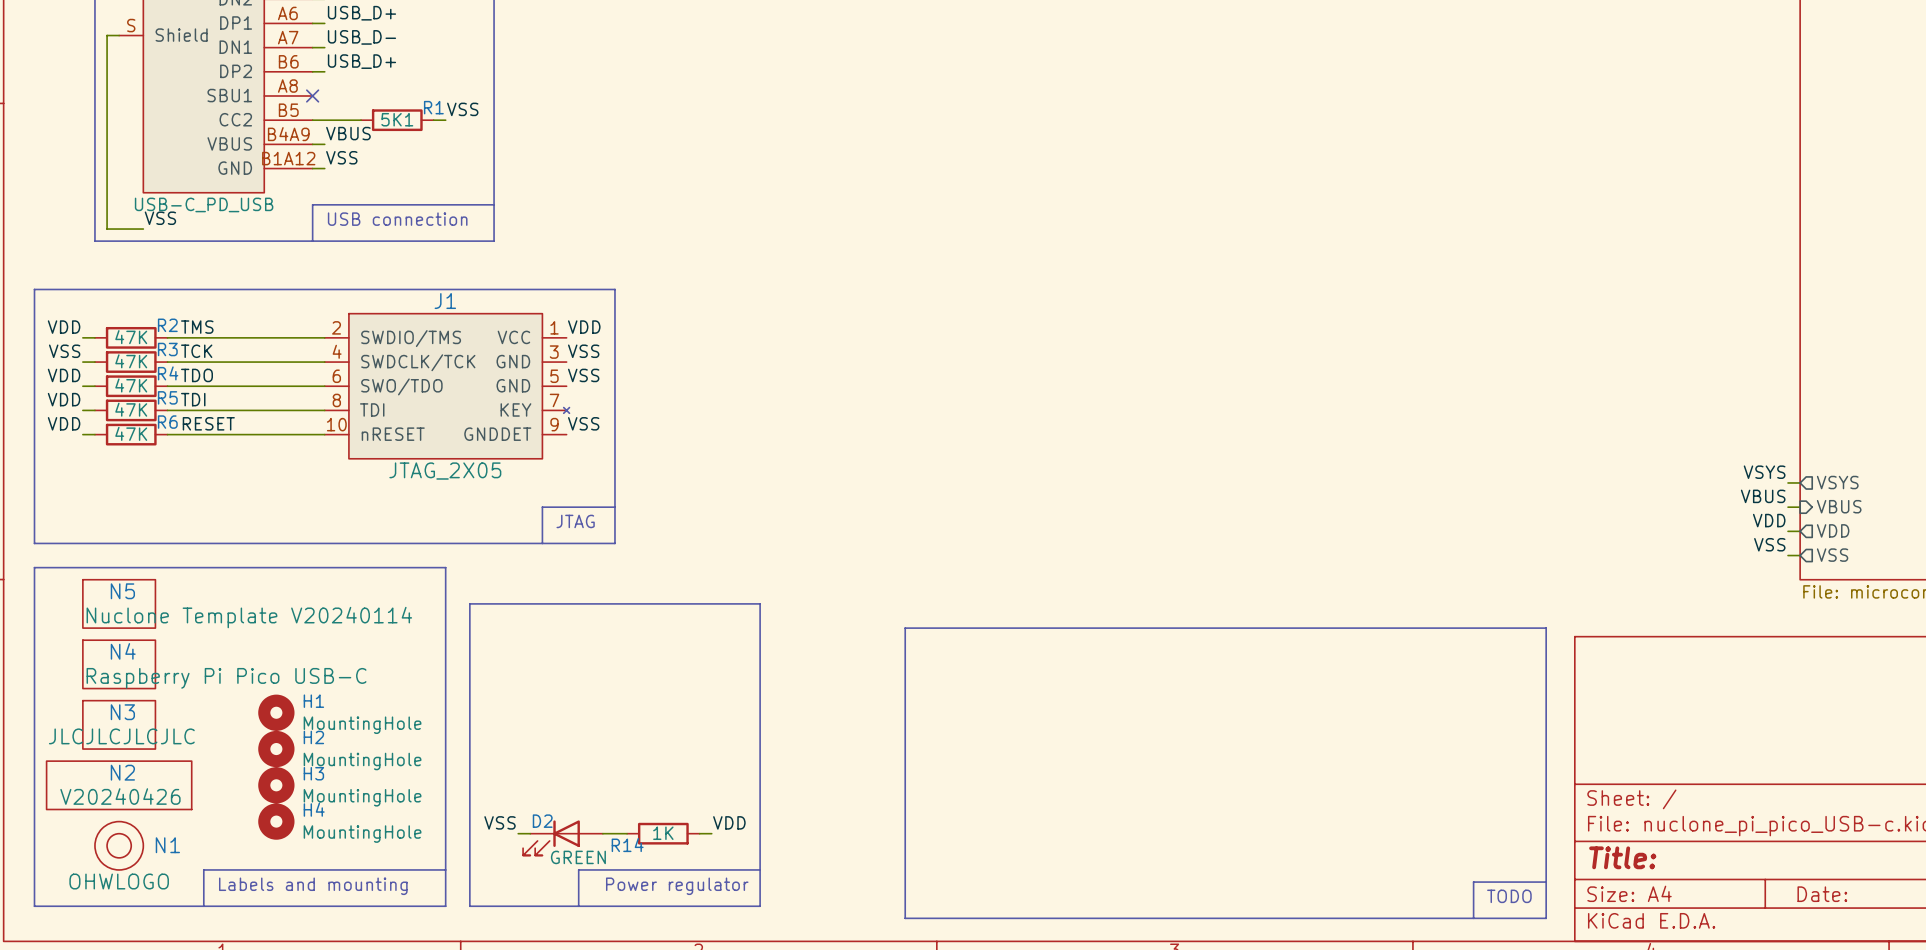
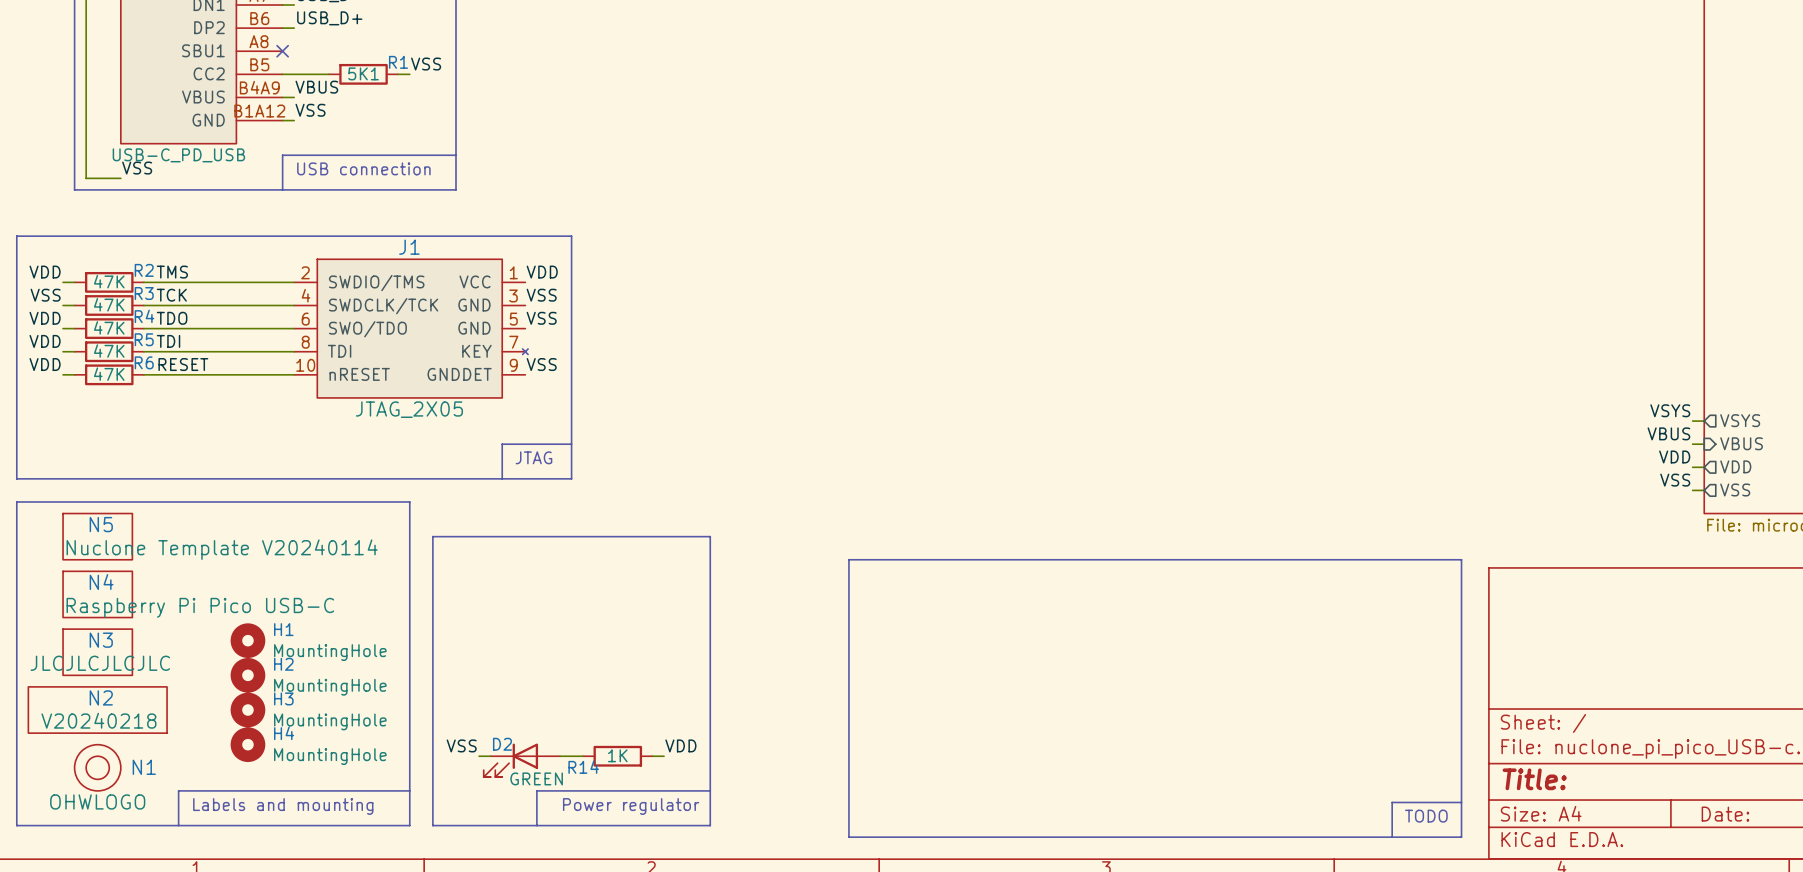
N2 value: V20240426 (120, 796) -> V20240218 (98, 720)

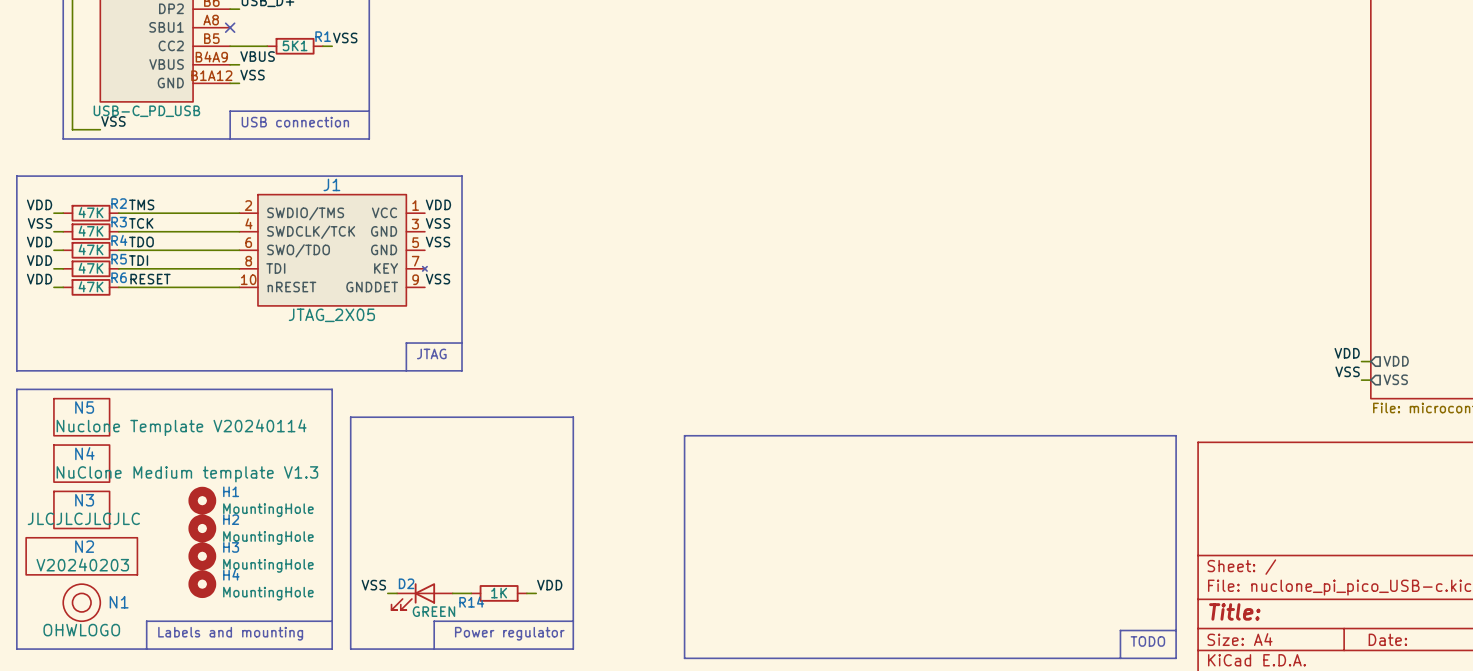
label: VSYS (1670, 410) -> none
sheet pin: VSYS (1740, 420) -> none
wire: (1692, 421) (1704, 421) -> none
label: VBUS (1668, 433) -> none
sheet pin: VBUS (1741, 443) -> none
wire: (1692, 444) (1704, 444) -> none
N4 value: Raspberry Pi Pico USB-C (200, 607) -> NuClone Medium template V1.3 (187, 474)
N2 value: V20240218 (98, 720) -> V20240203 (82, 564)

